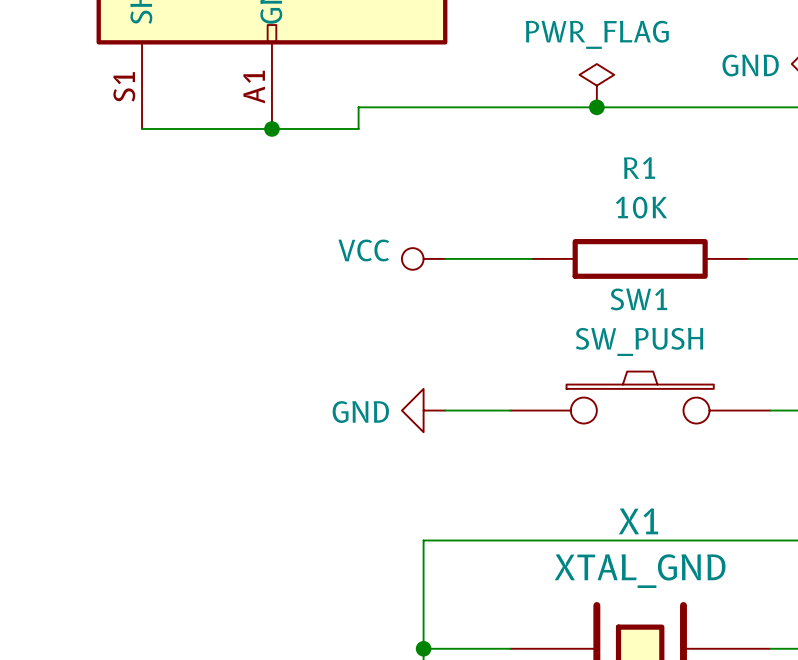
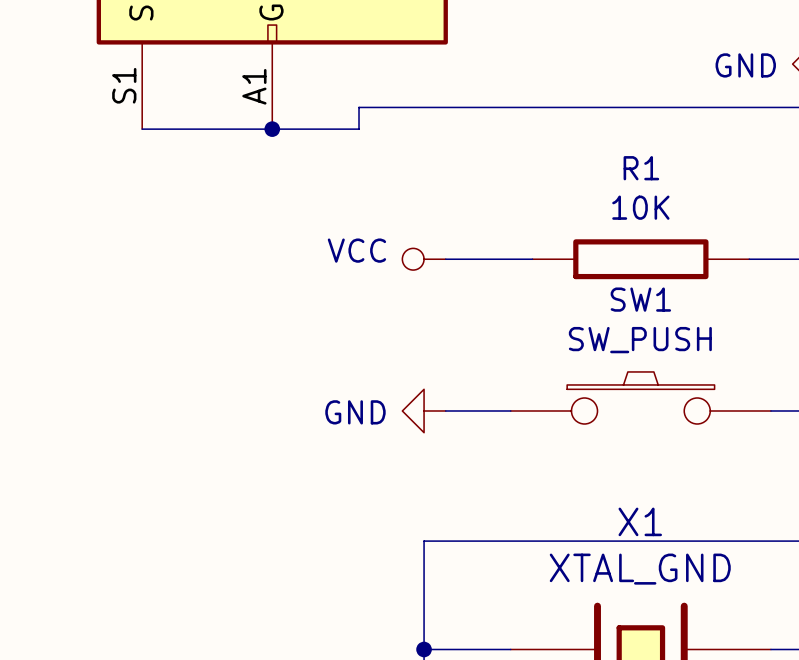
power symbol: PWR_FLAG (596, 85) -> none
junction: (596, 107) -> none

